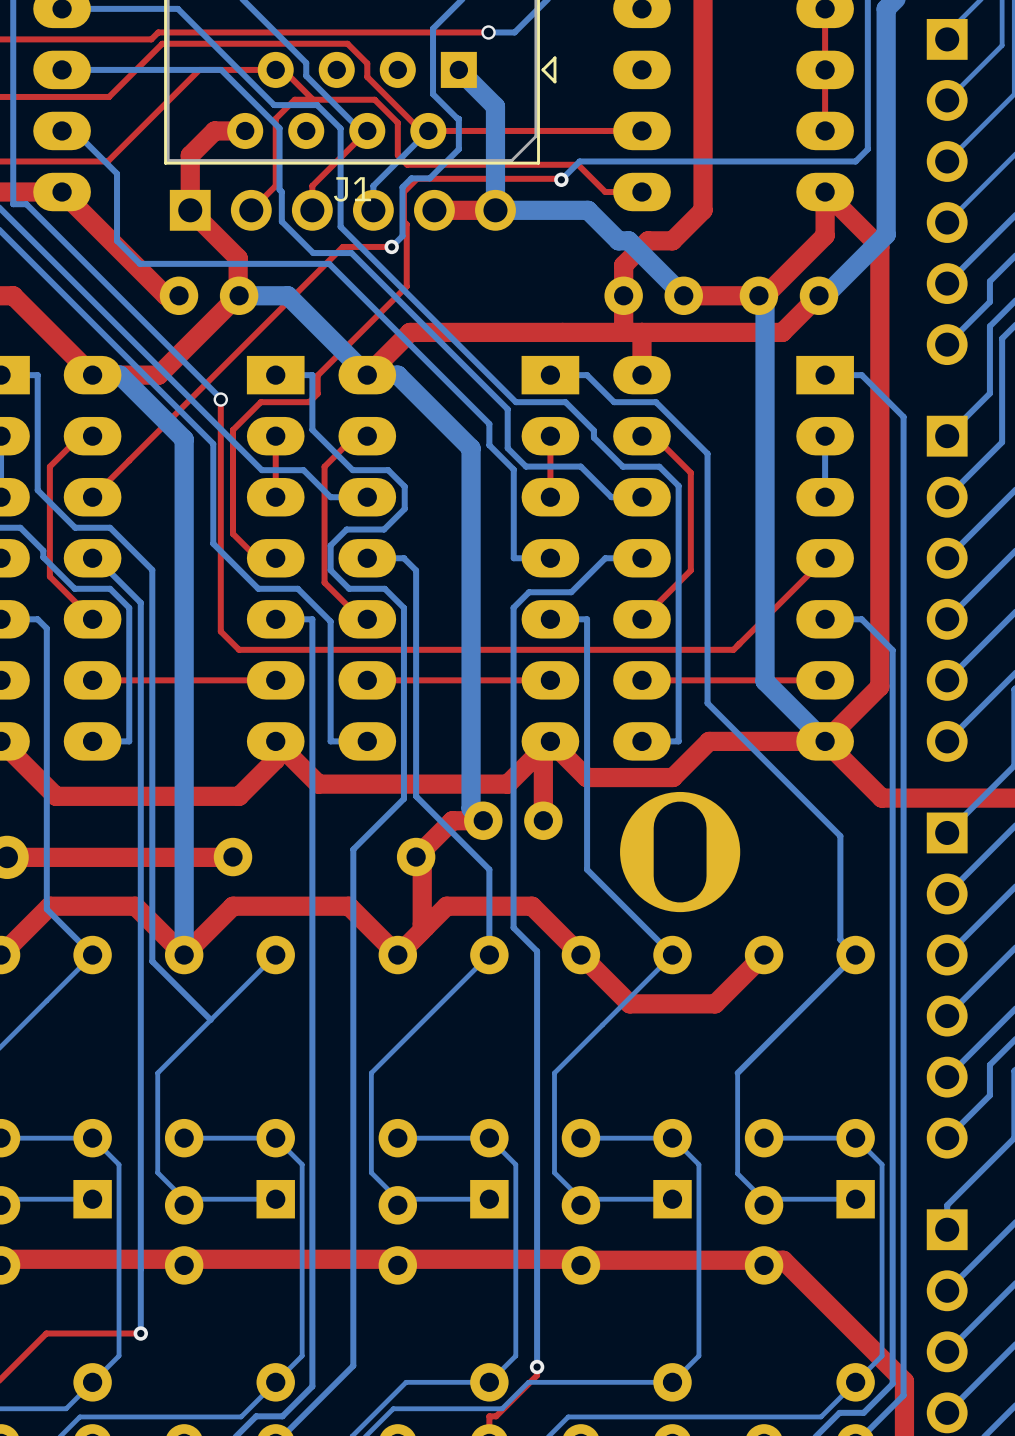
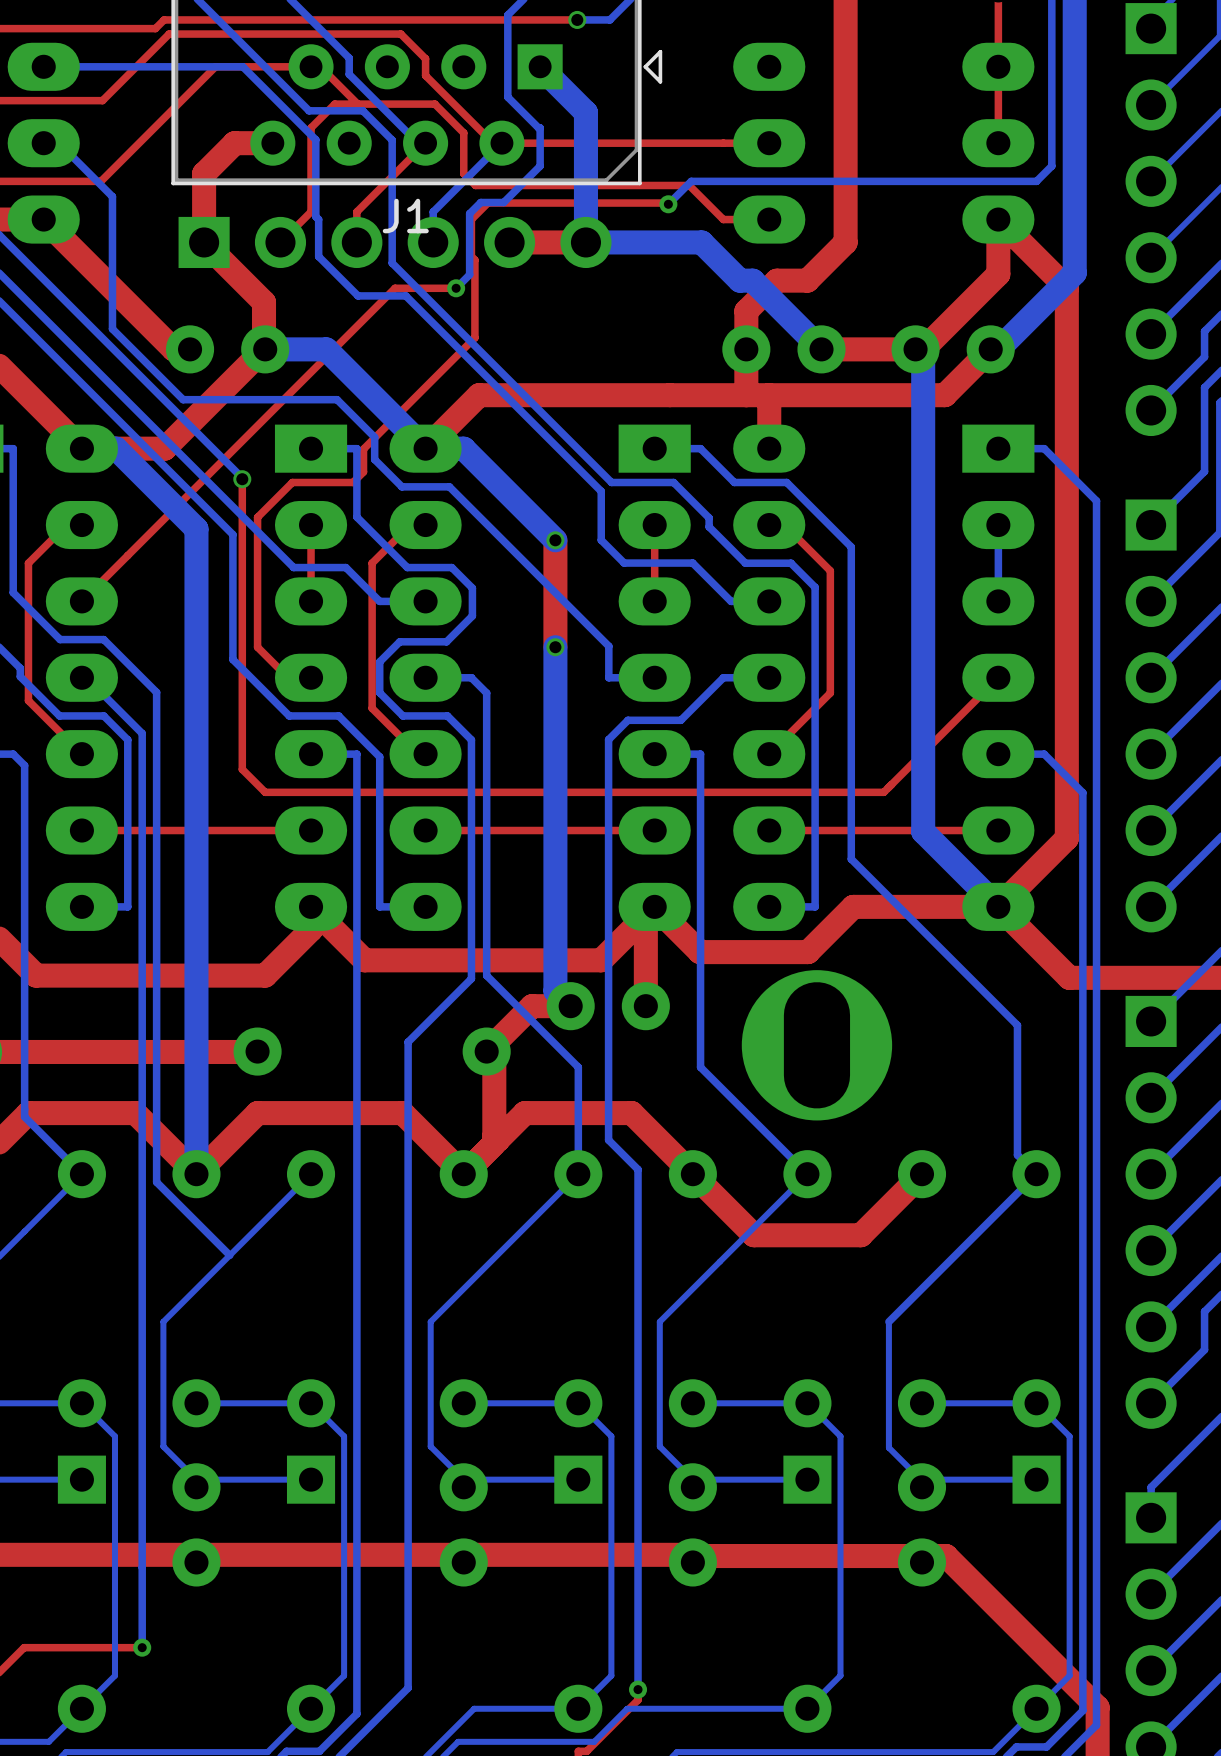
bottom track: (117, 240) (140, 263) (329, 263) (489, 423) (489, 445) (513, 469) (513, 533) -> (112, 280) (112, 329) (183, 399) (337, 399) (374, 437) (374, 459) (401, 486) (449, 486) (608, 646)
top track: none -> (555, 540) (555, 647)
bottom track: (471, 448) (471, 533) -> none
via: none -> (555, 540)
via: none -> (555, 647)

